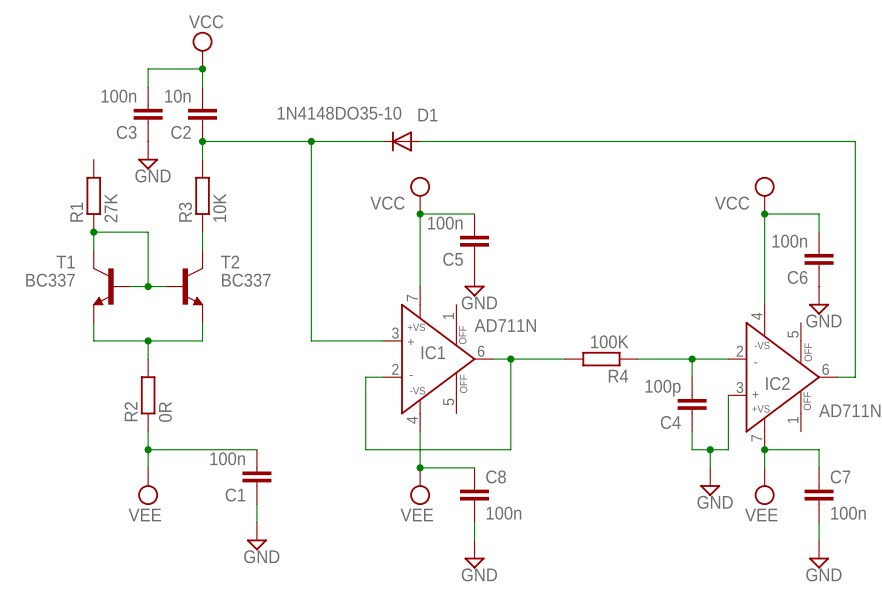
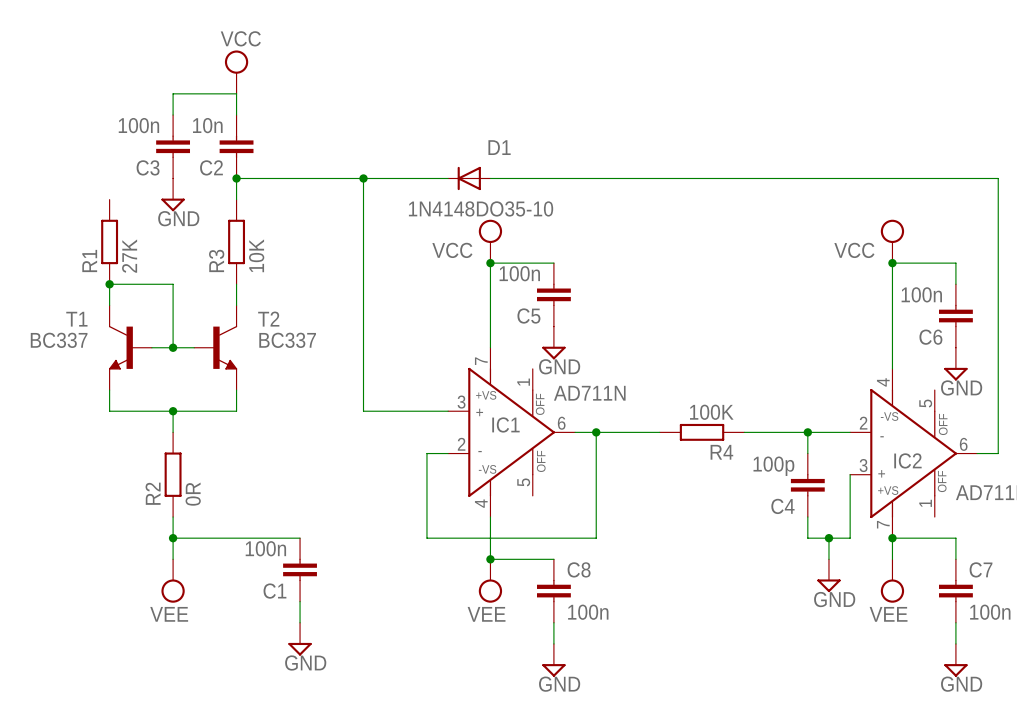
junction: (202, 68) -> none
D1 value position: 1N4148DO35-10 (339, 113) -> 1N4148DO35-10 (481, 208)

